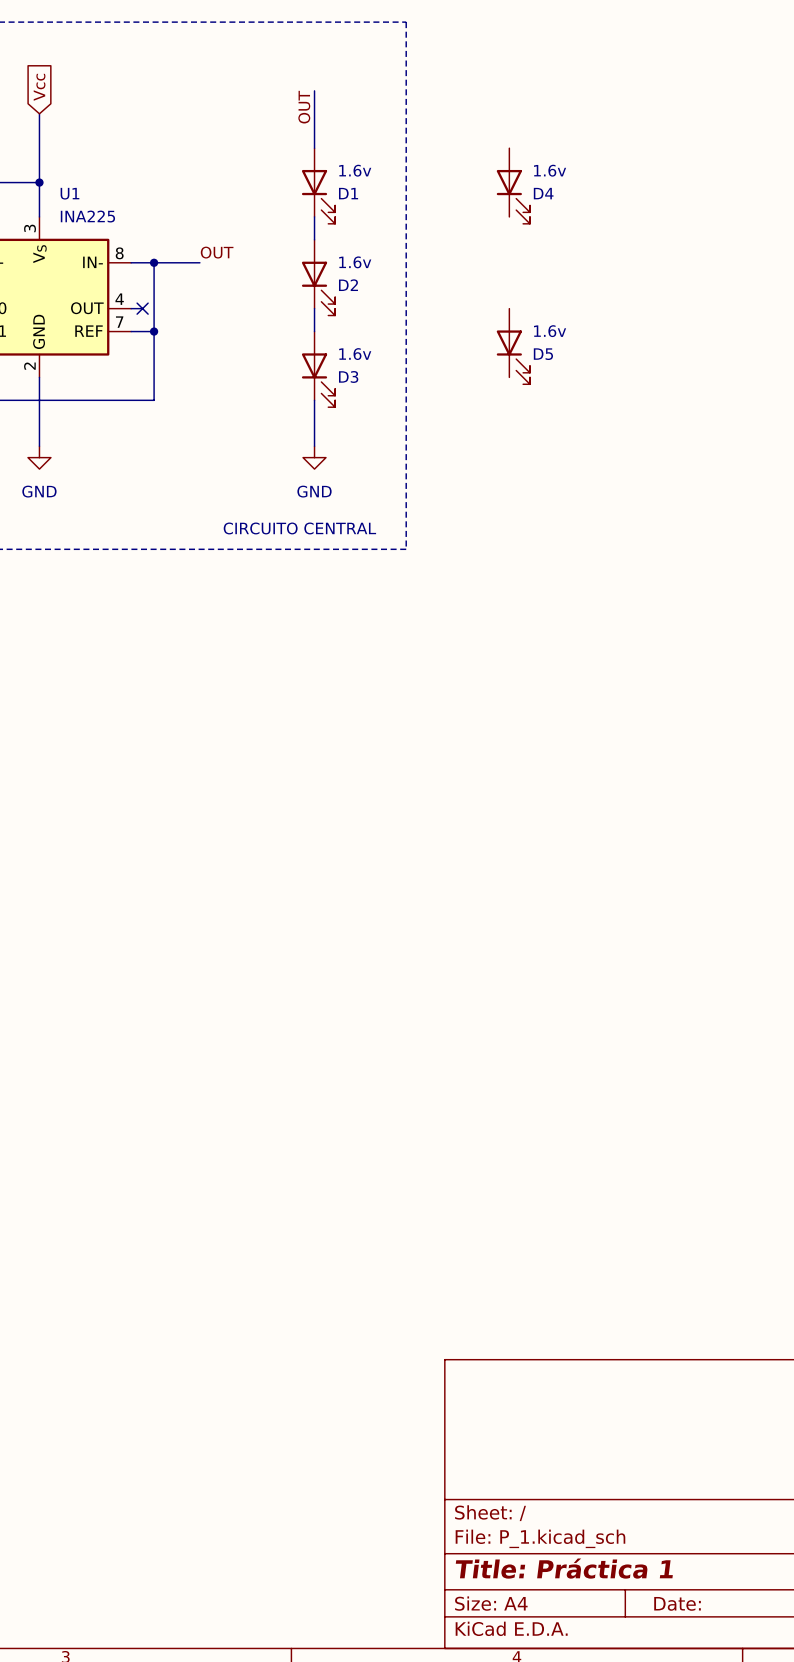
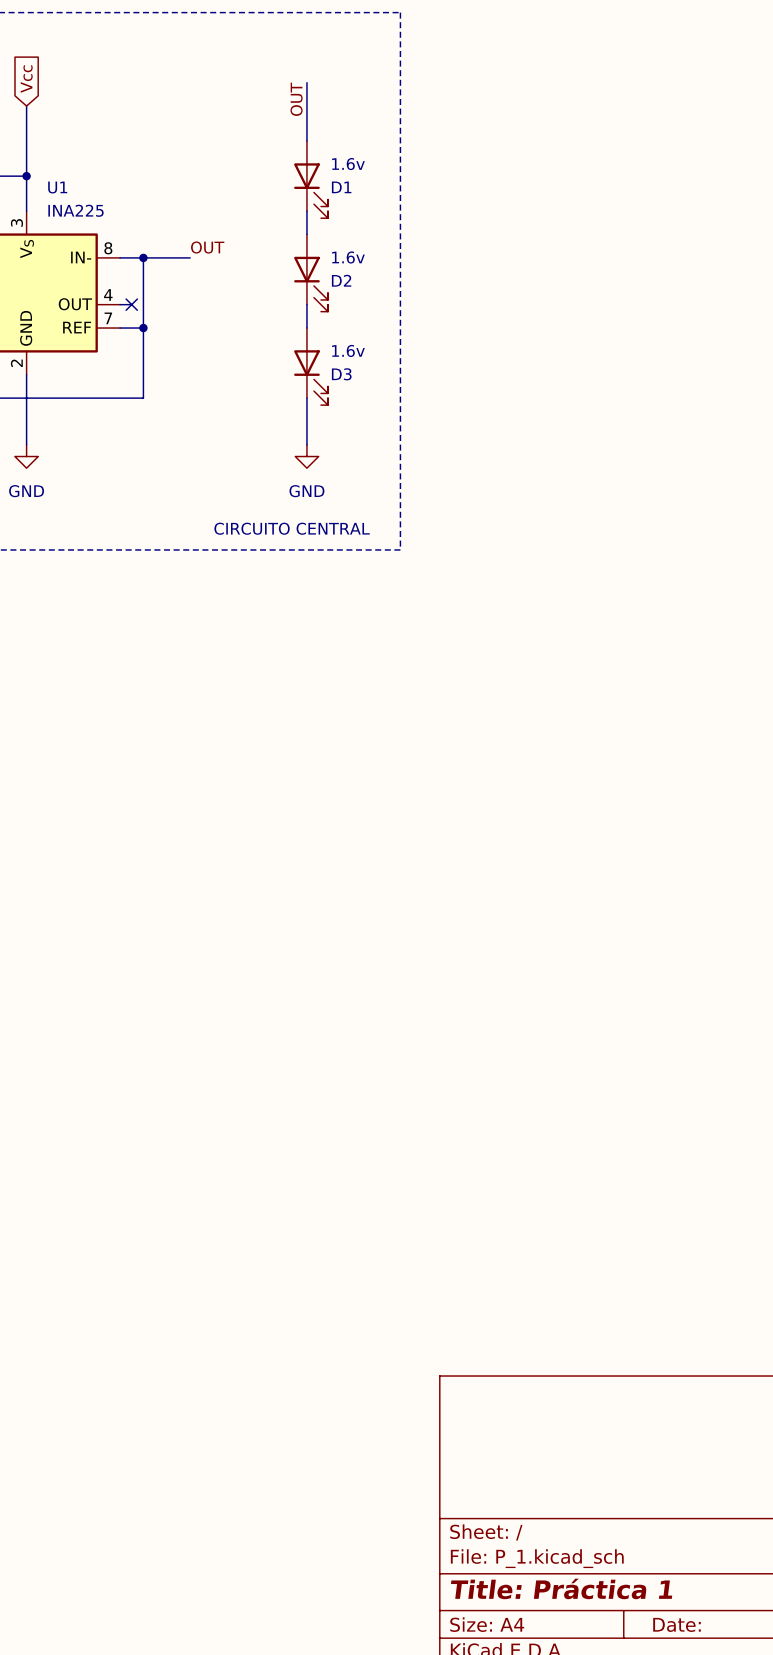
D4: 1.6v (513, 186) -> none
D5: 1.6v (513, 346) -> none

